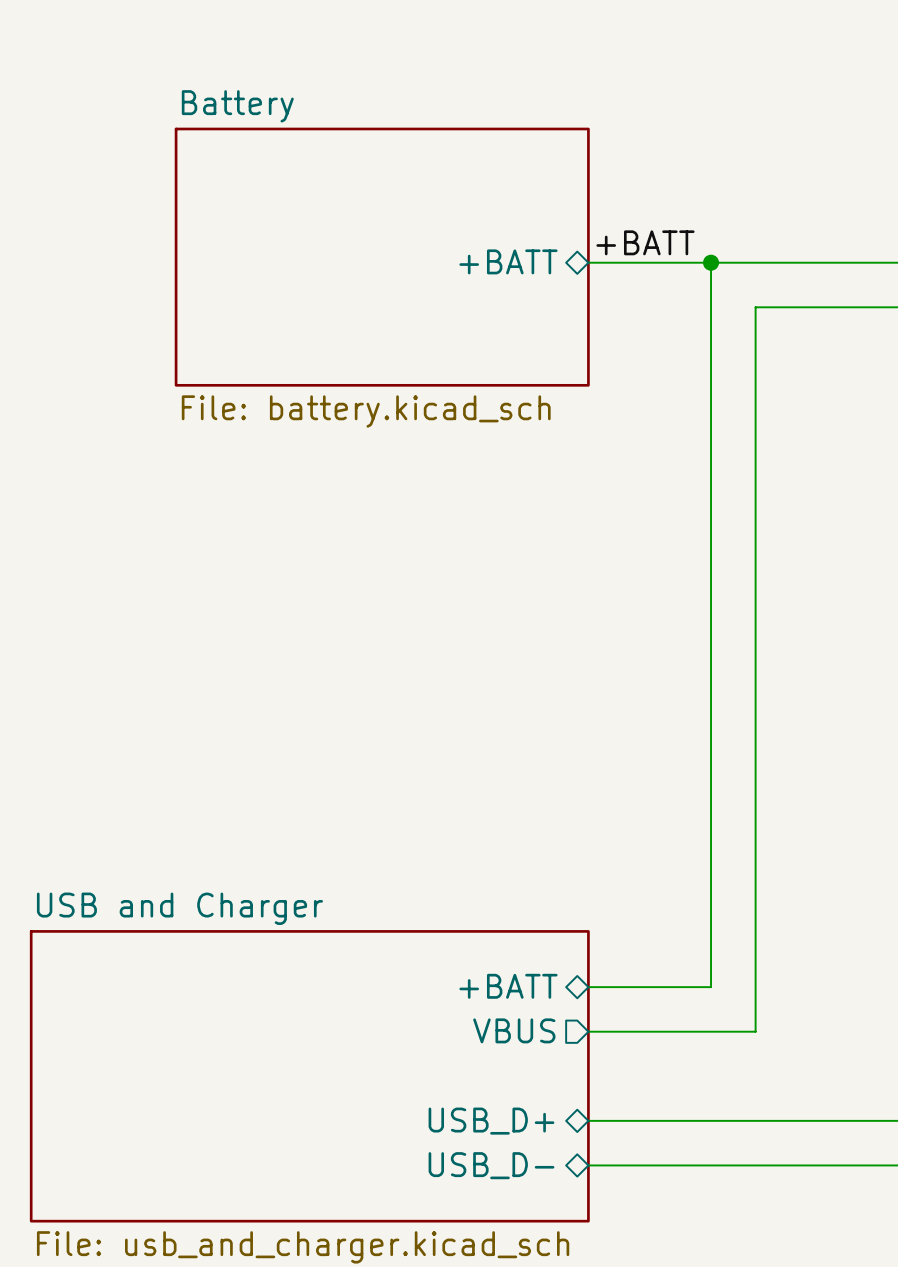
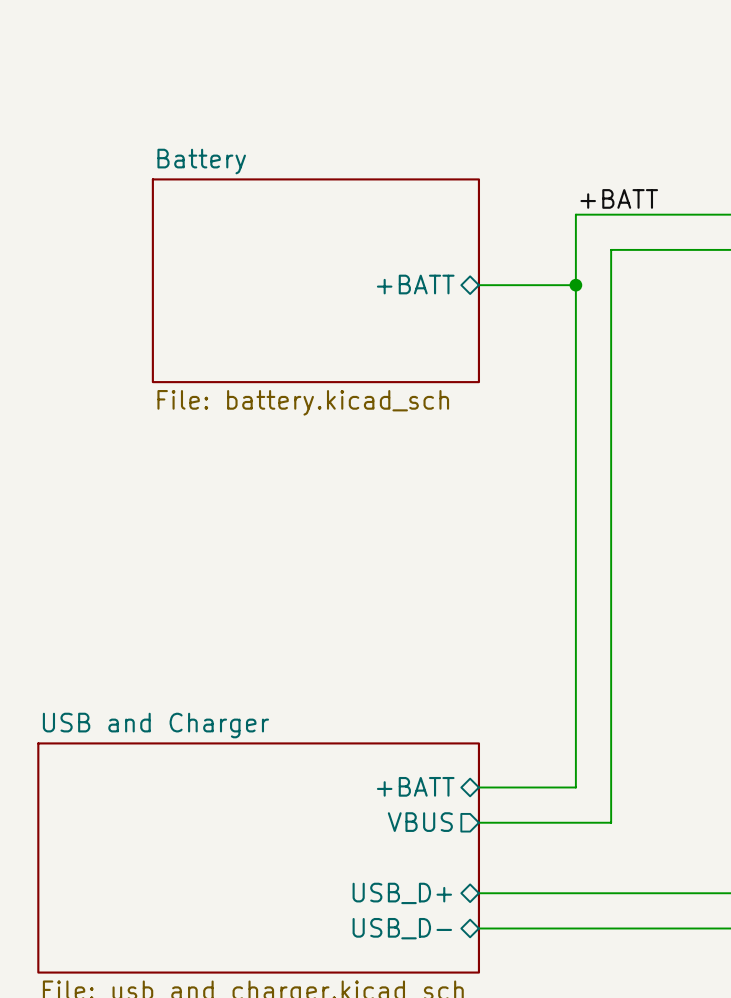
label position: +BATT (645, 242) -> +BATT (619, 198)
sheet Battery position: (382, 257) -> (315, 280)
sheet pin position: +BATT (508, 261) -> +BATT (415, 284)
wire: (588, 262) (711, 262) -> (478, 285) (575, 285)
junction position: (711, 262) -> (575, 285)

